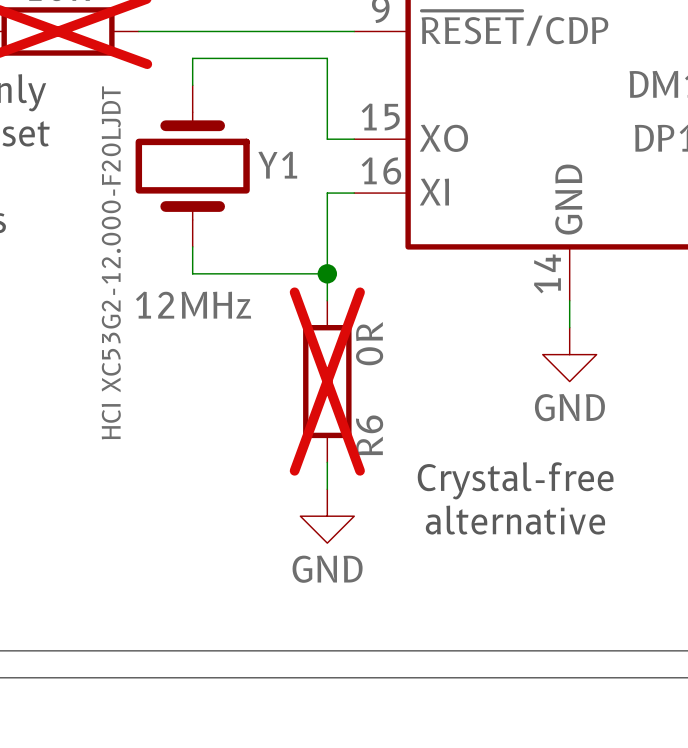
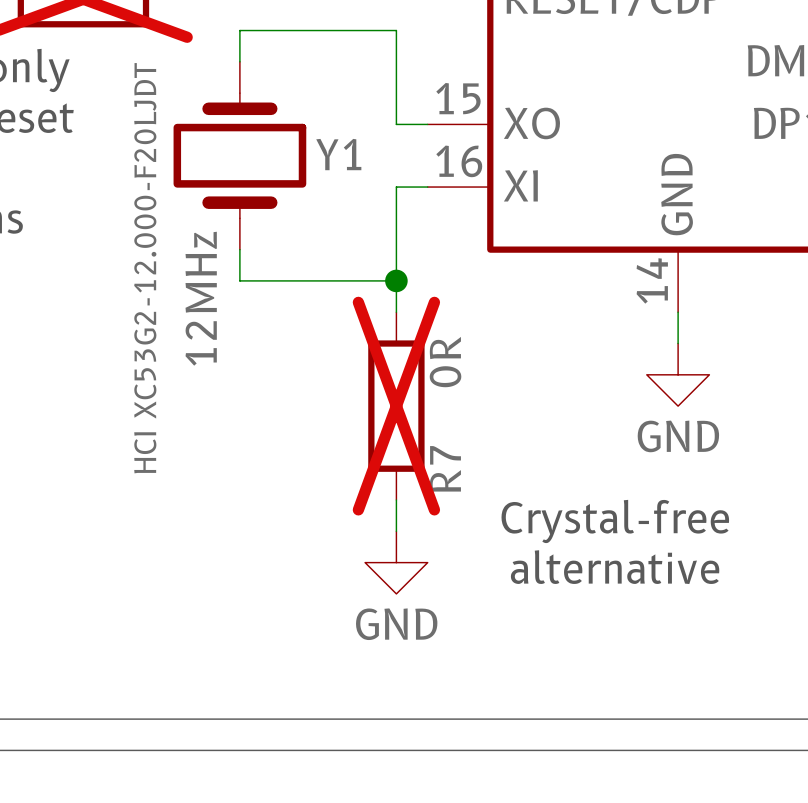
Y1 text: none -> 12MHz (201, 298)
Y1 text: 12MHz (193, 305) -> none
R6 name: R6 (369, 435) -> R7 (445, 469)

